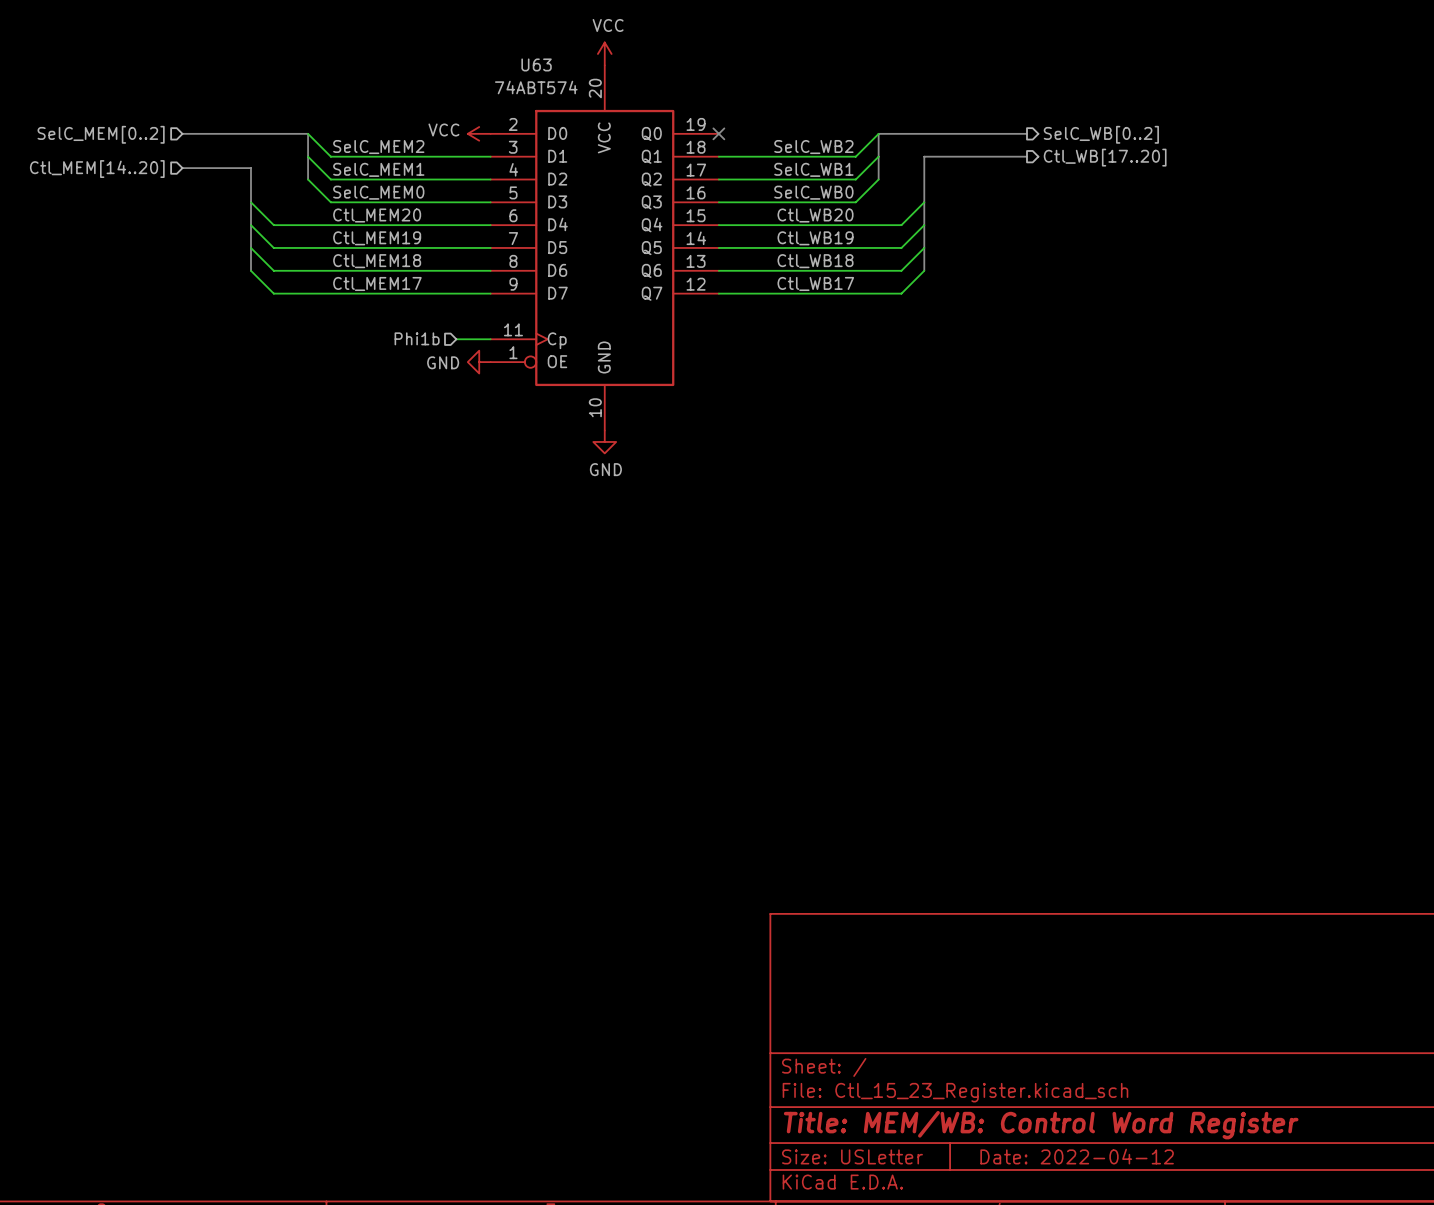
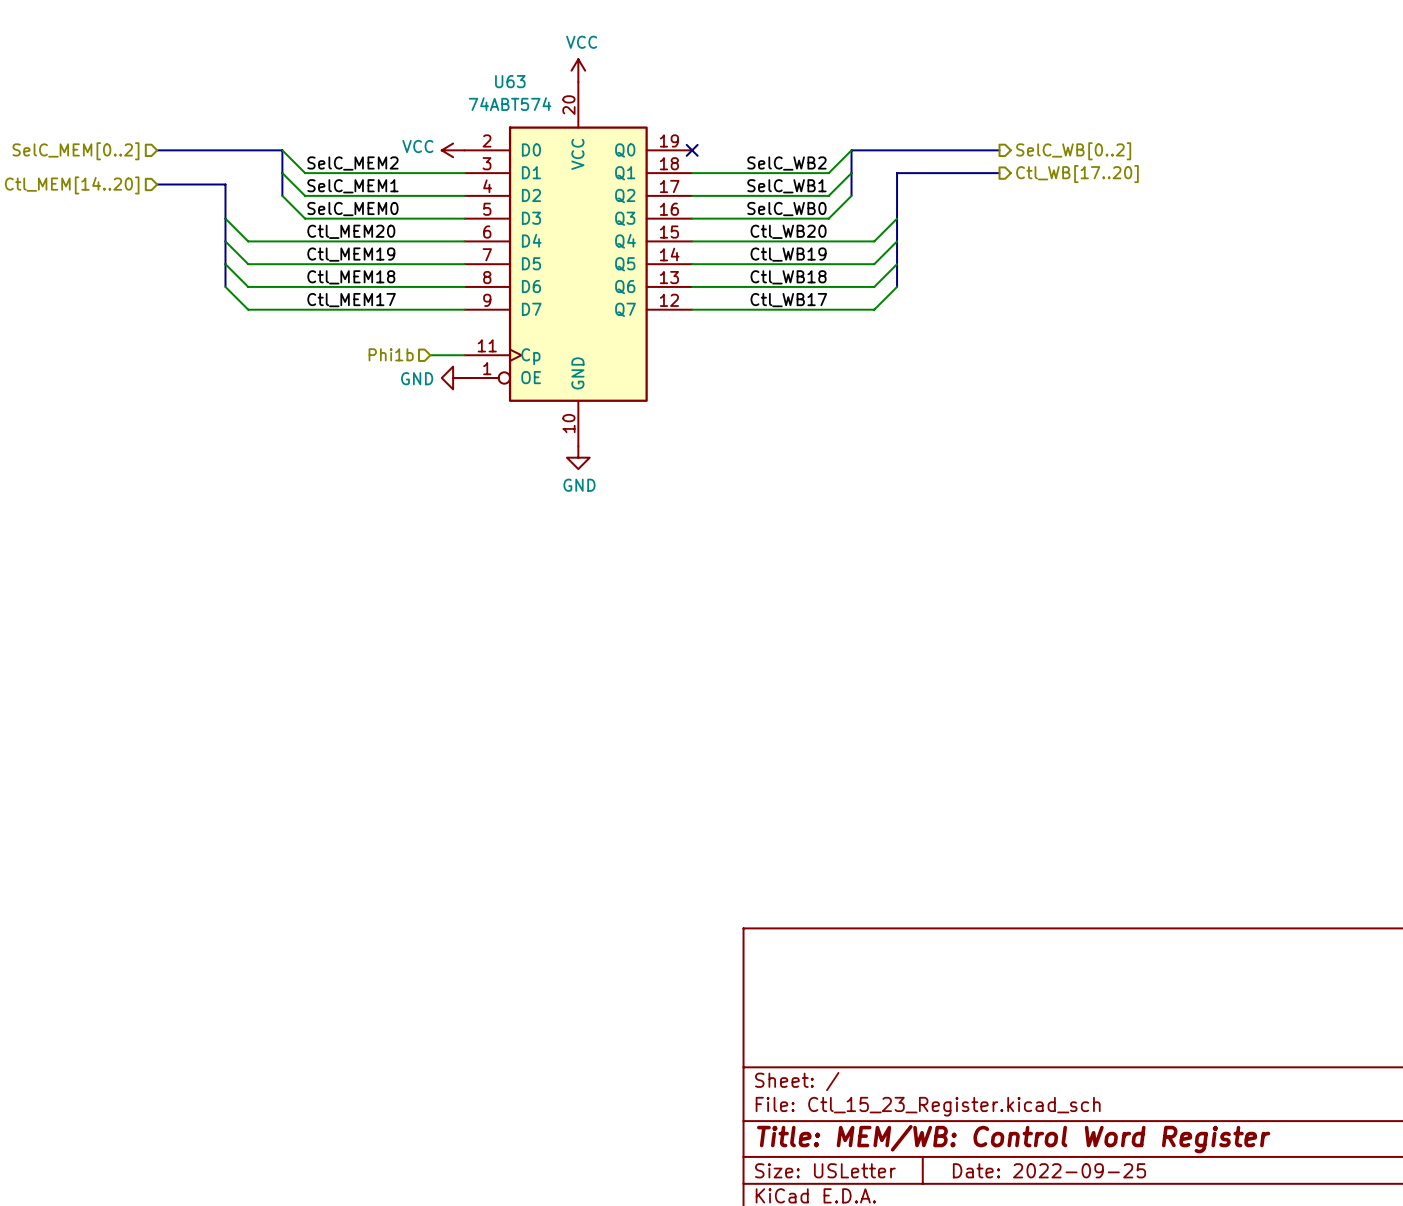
title block: Date: 2022-04-12 (1077, 1156) -> Date: 2022-09-25 (1049, 1170)

